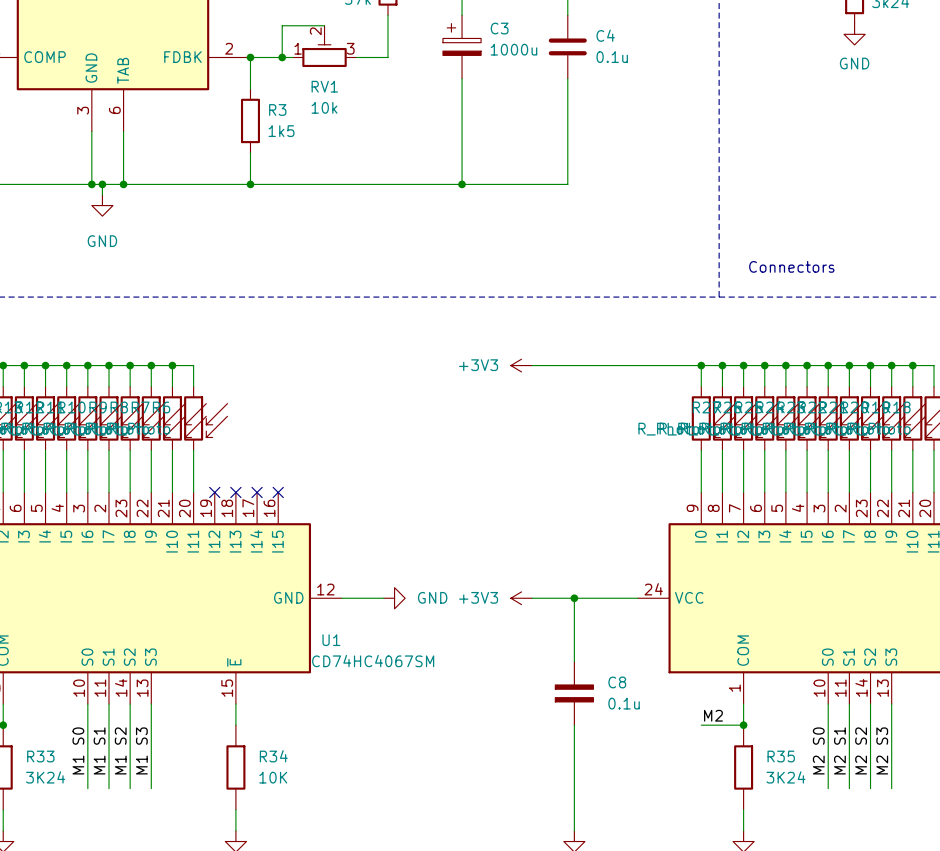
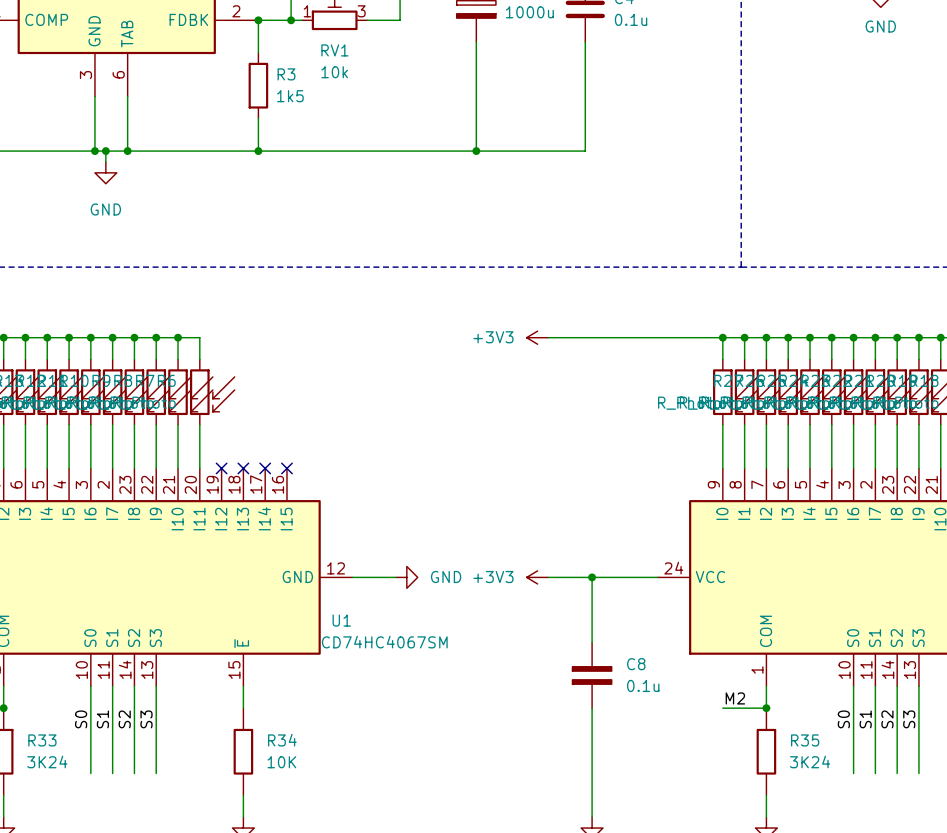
text: Connectors (791, 266) -> none
label: M1 S0 (78, 750) -> S0 (81, 719)
label: M1 S1 (99, 750) -> S1 (102, 719)
label: M1 S2 (120, 750) -> S2 (124, 719)
label: M1 S3 (141, 750) -> S3 (146, 719)
label: M2 S0 (818, 750) -> S0 (843, 719)
label: M2 S1 (839, 750) -> S1 (865, 719)
label: M2 S2 (861, 750) -> S2 (887, 719)
label: M2 S3 (882, 750) -> S3 (909, 719)

